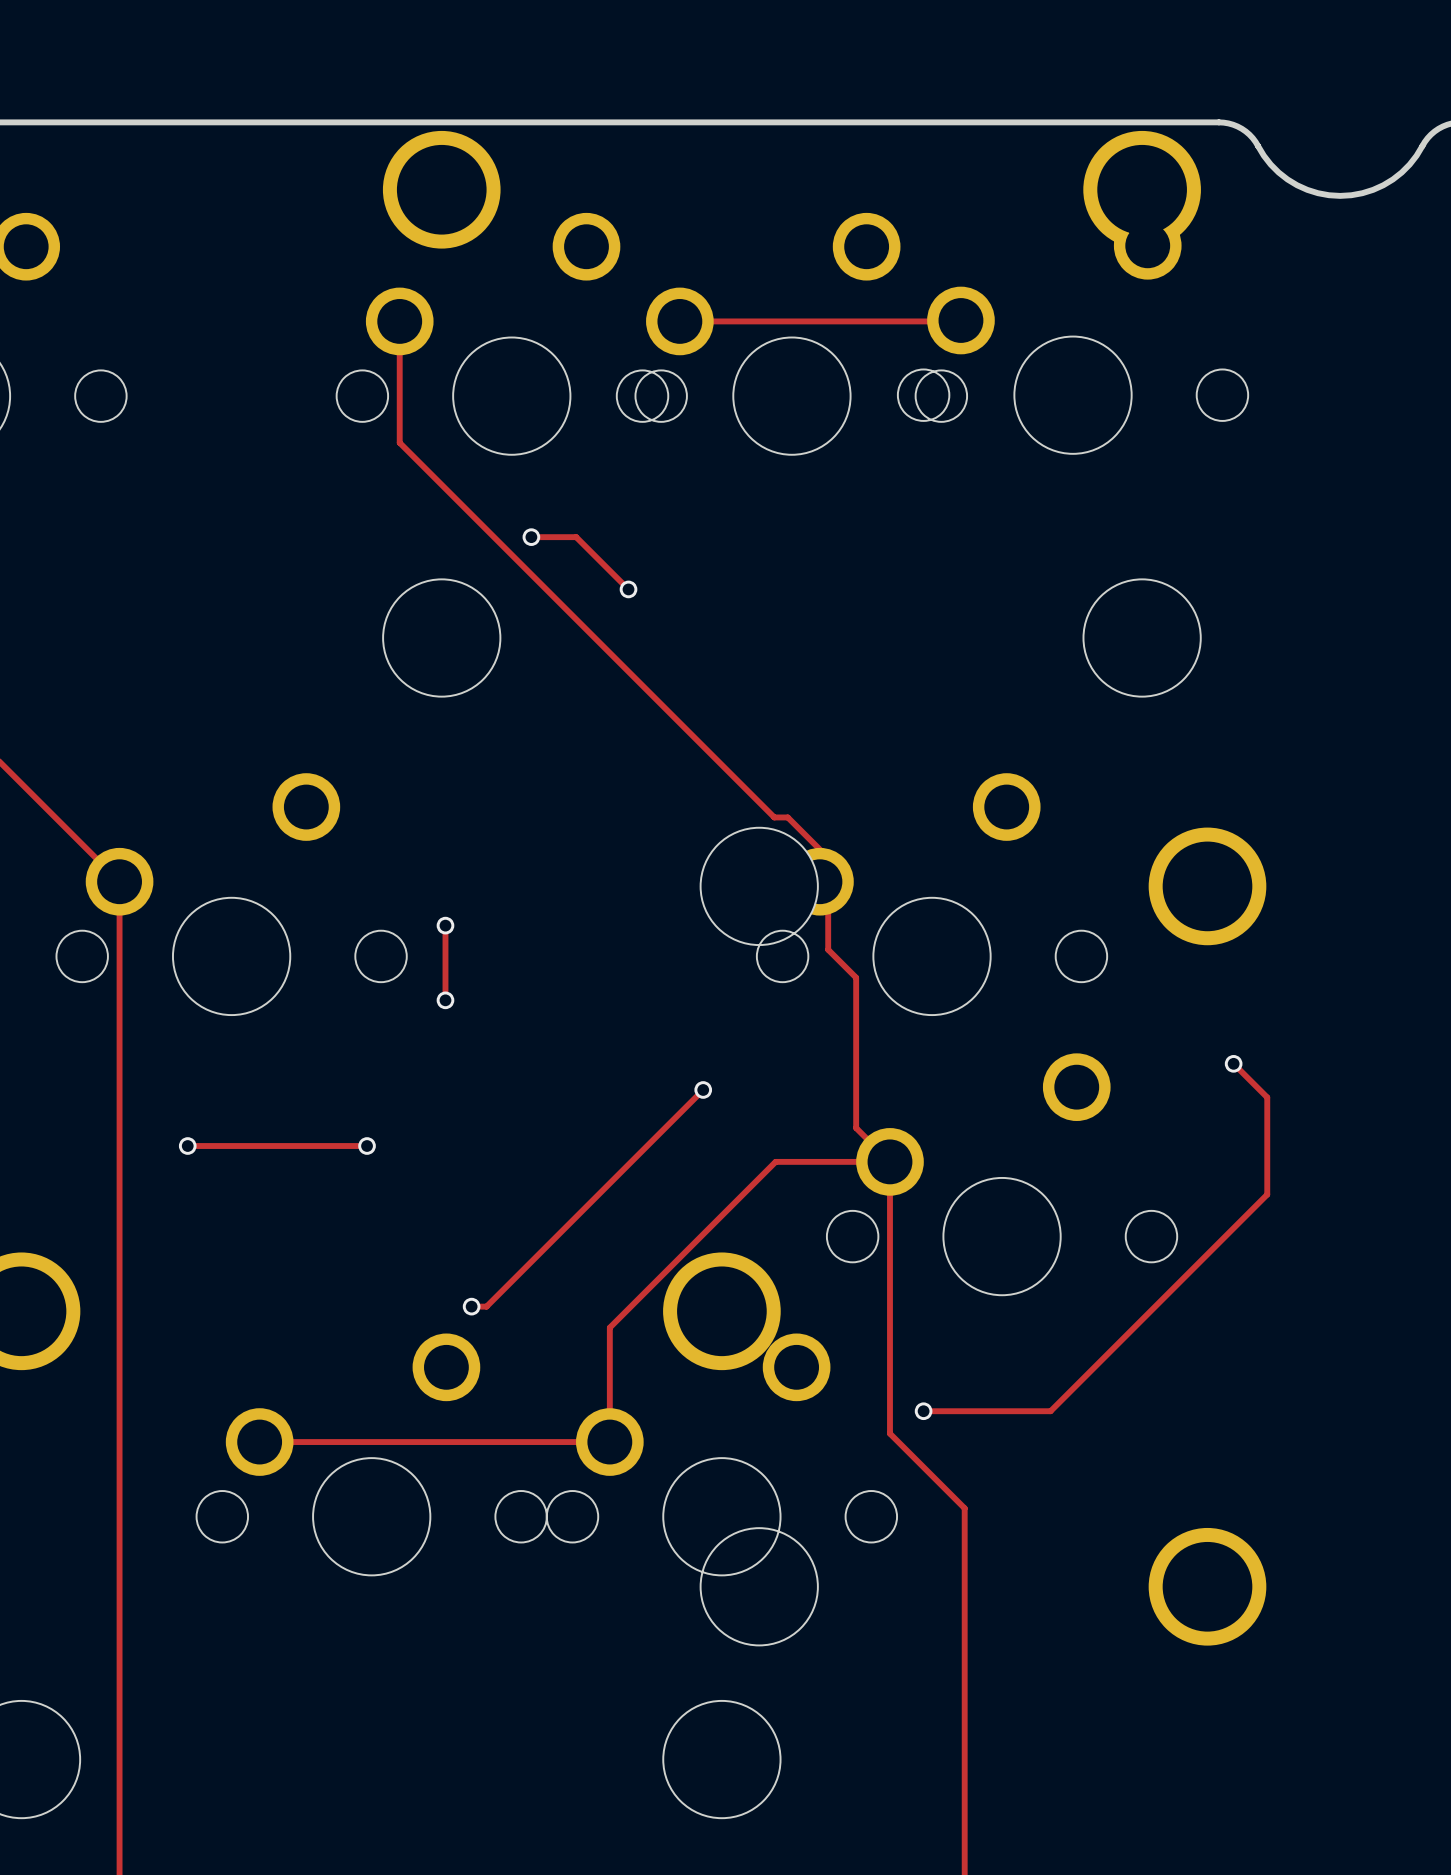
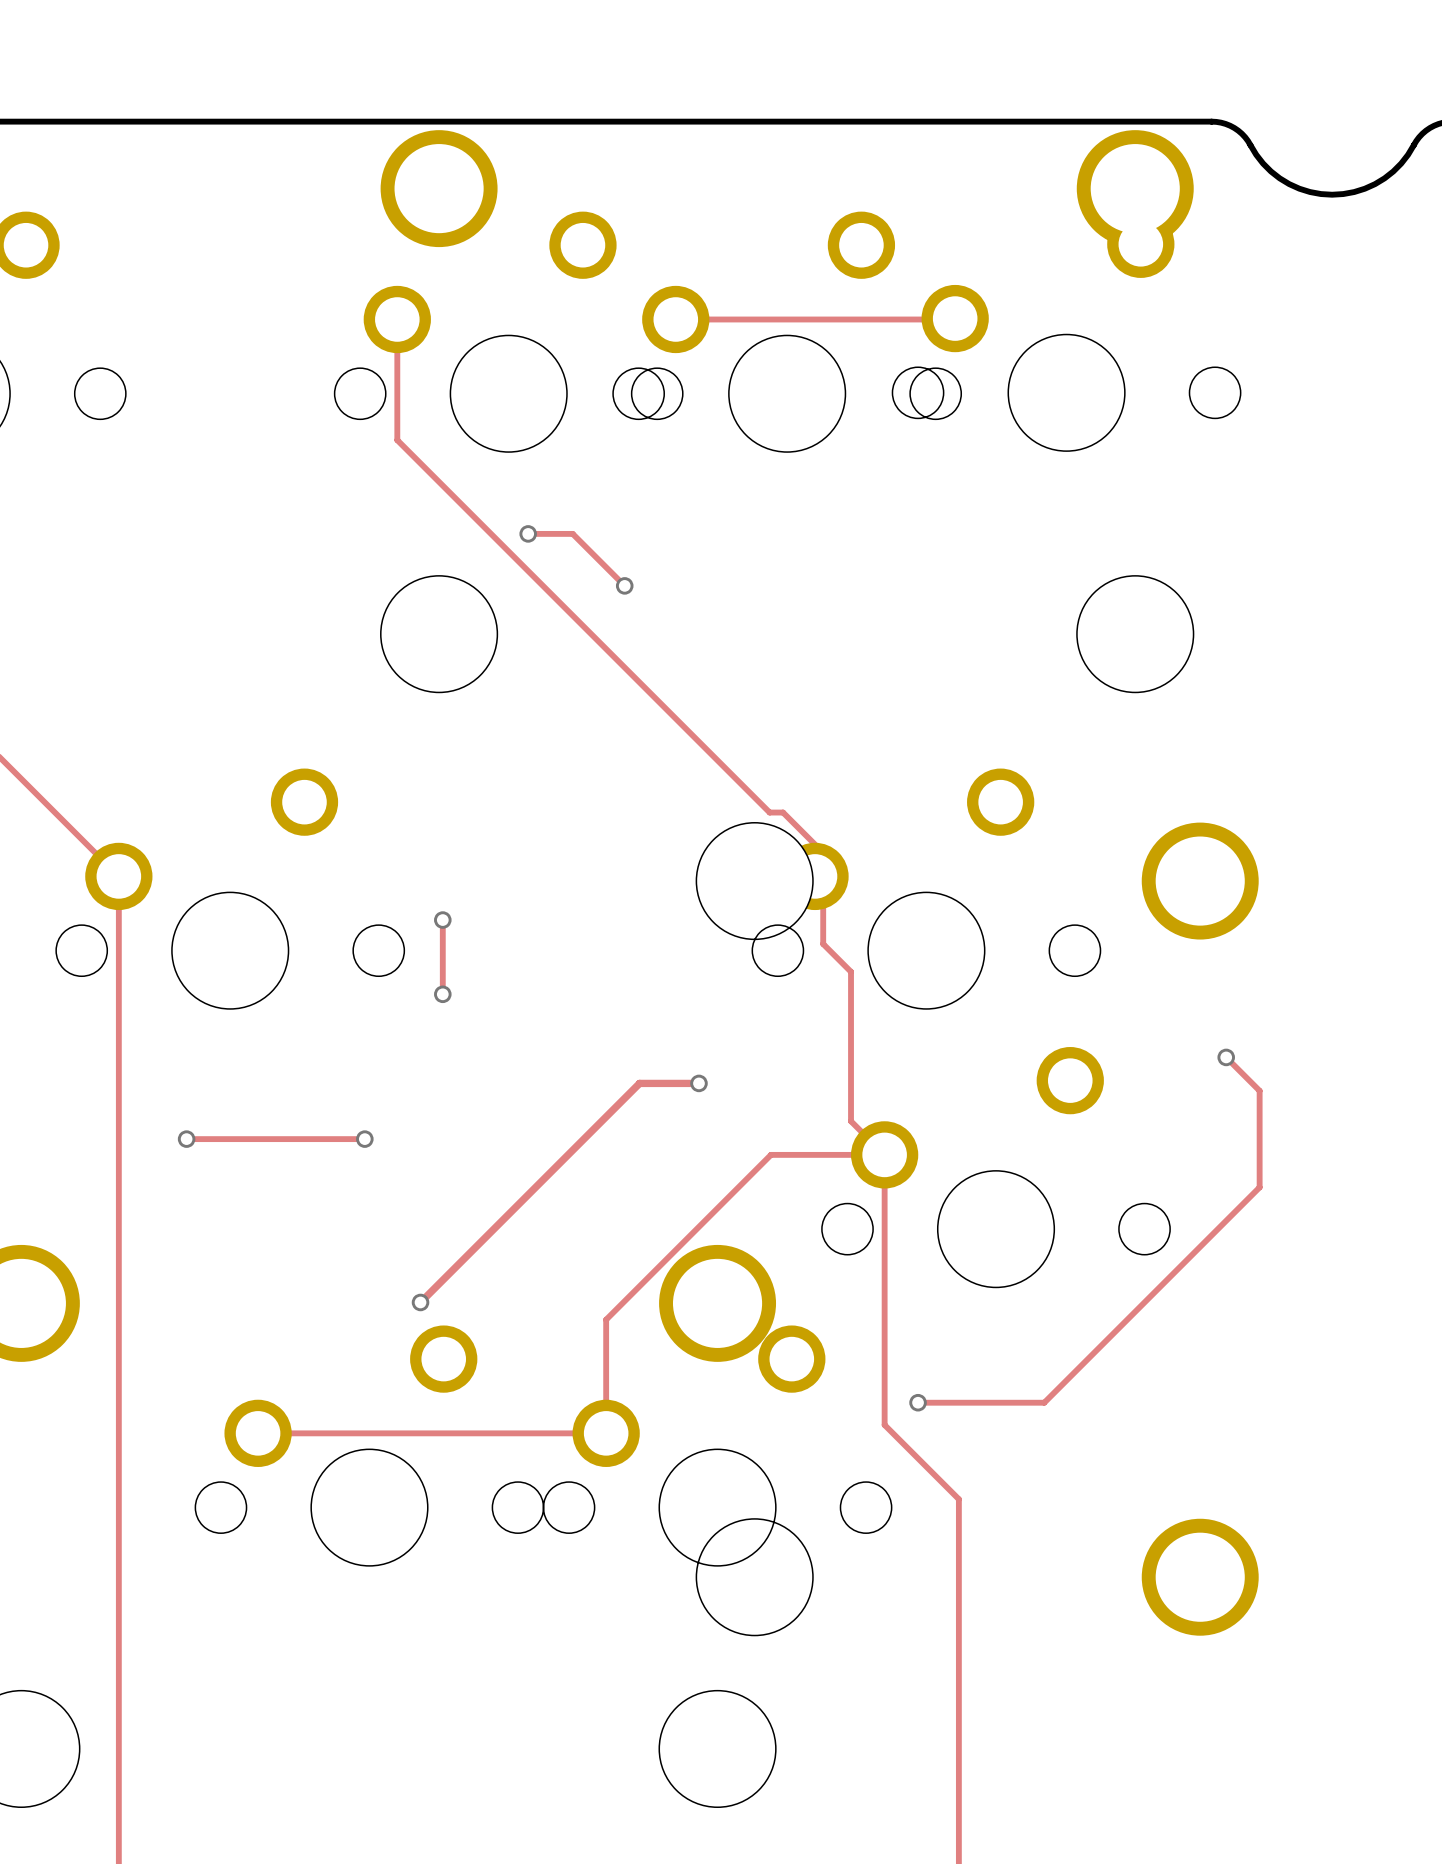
track: (703, 1089) (486, 1306) (471, 1306) -> (698, 1083) (639, 1083) (420, 1302)
via position: (471, 1306) -> (420, 1302)

